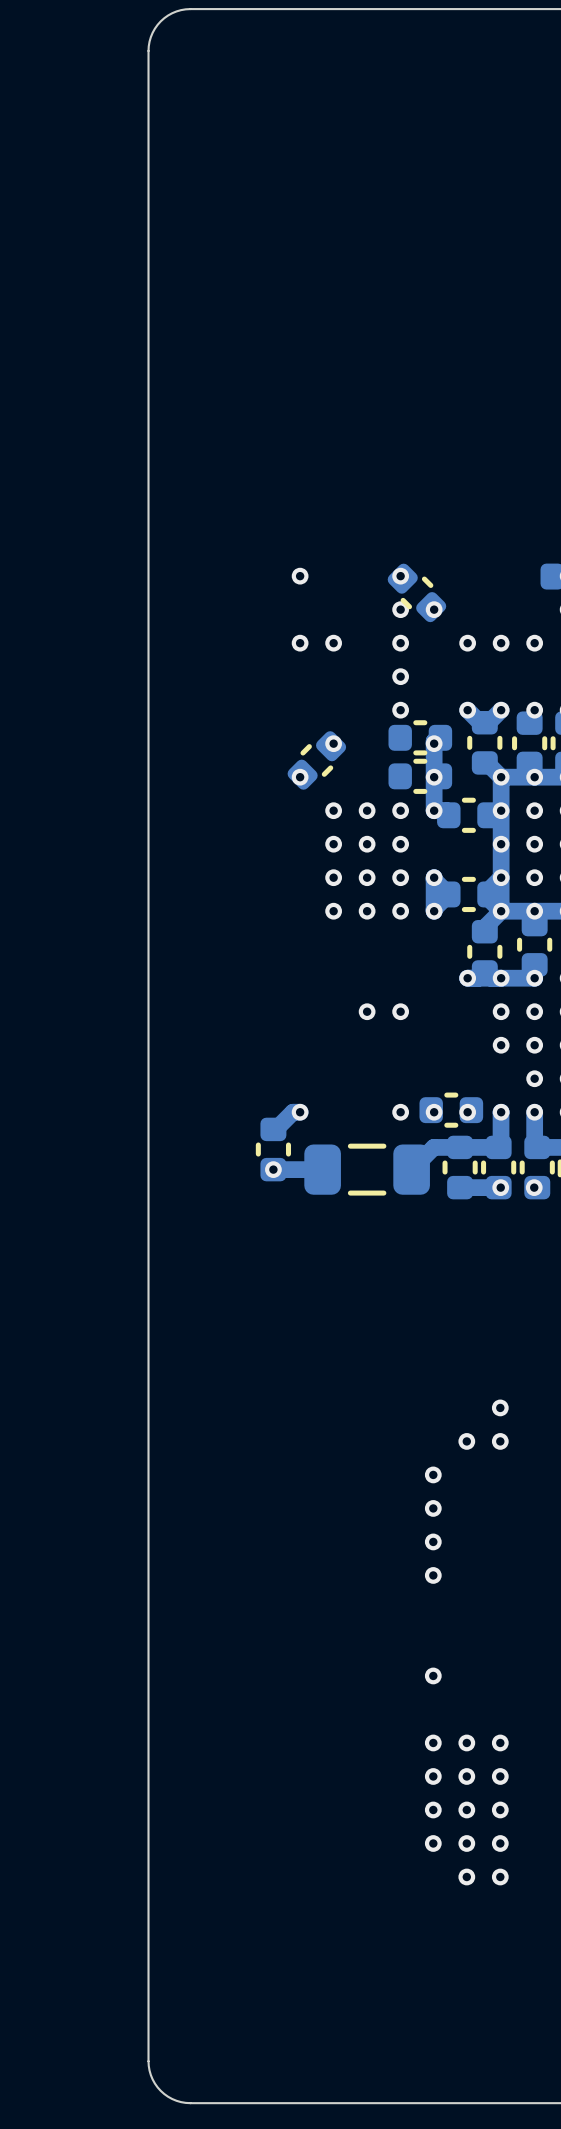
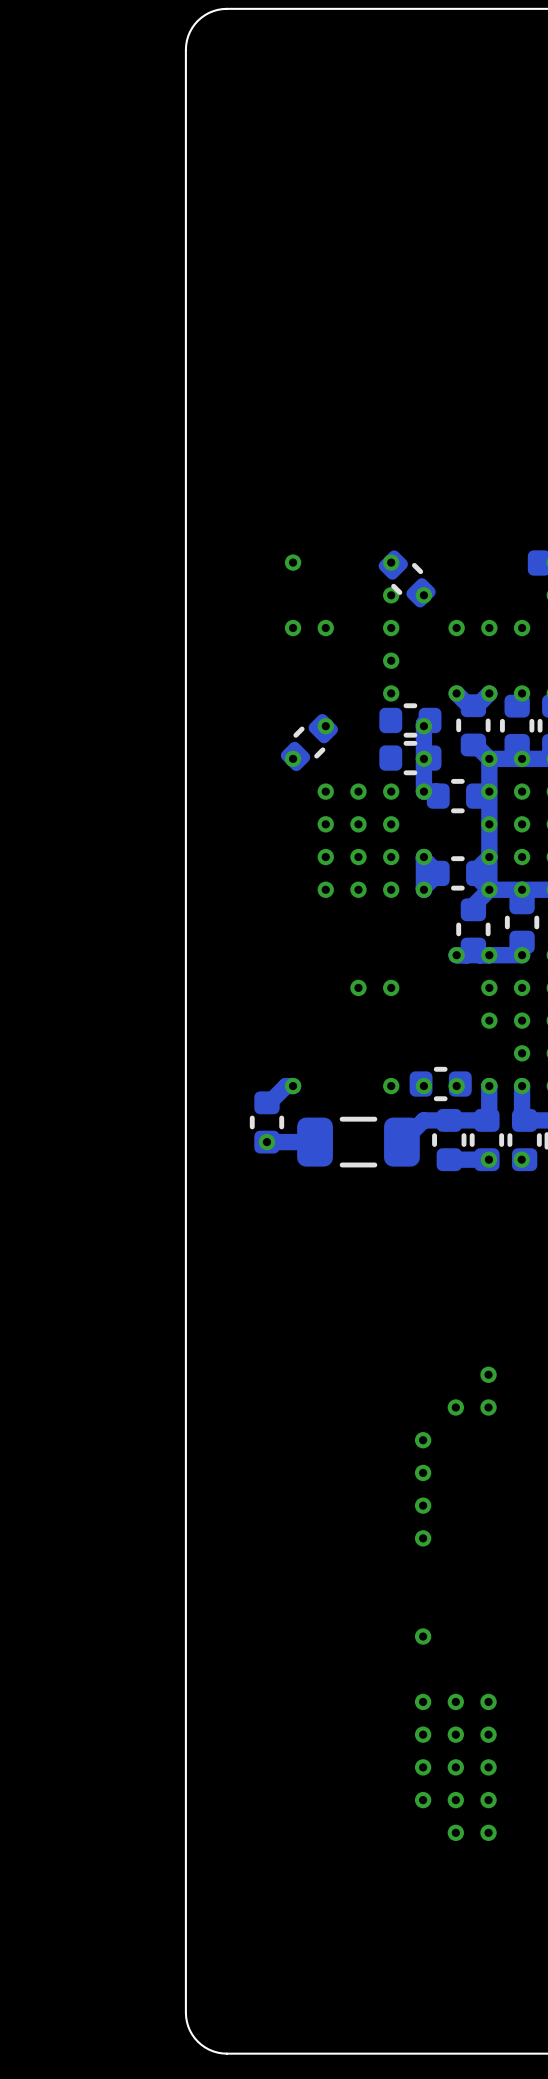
board edge: (232, 9) (185, 9) (172, 13) (164, 18) (154, 28) (149, 41) (148, 50) (148, 2061) (150, 2075) (154, 2083) (160, 2090) (172, 2099) (185, 2102) (232, 2103) -> (226, 8) (213, 11) (197, 20) (188, 36) (185, 49) (185, 2012) (188, 2026) (197, 2041) (213, 2051) (226, 2053)

